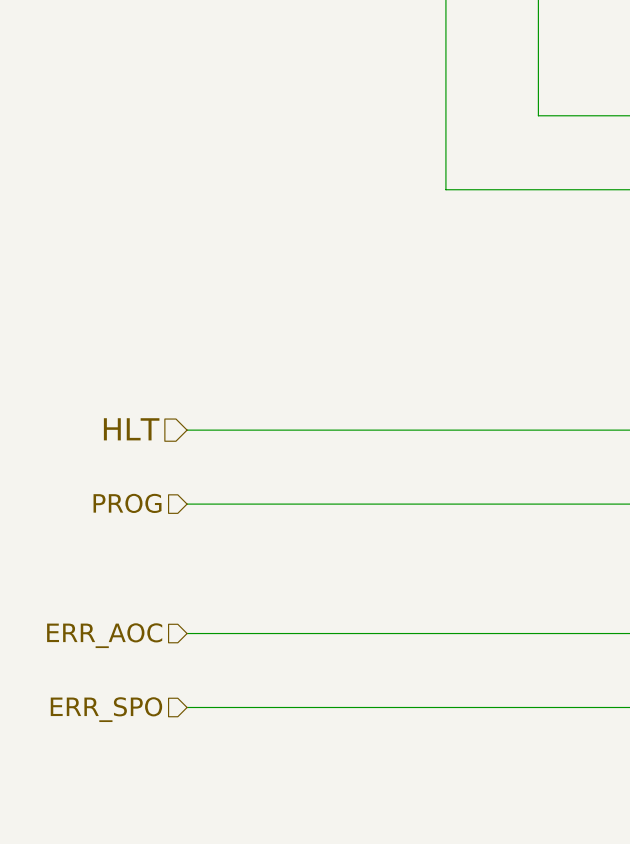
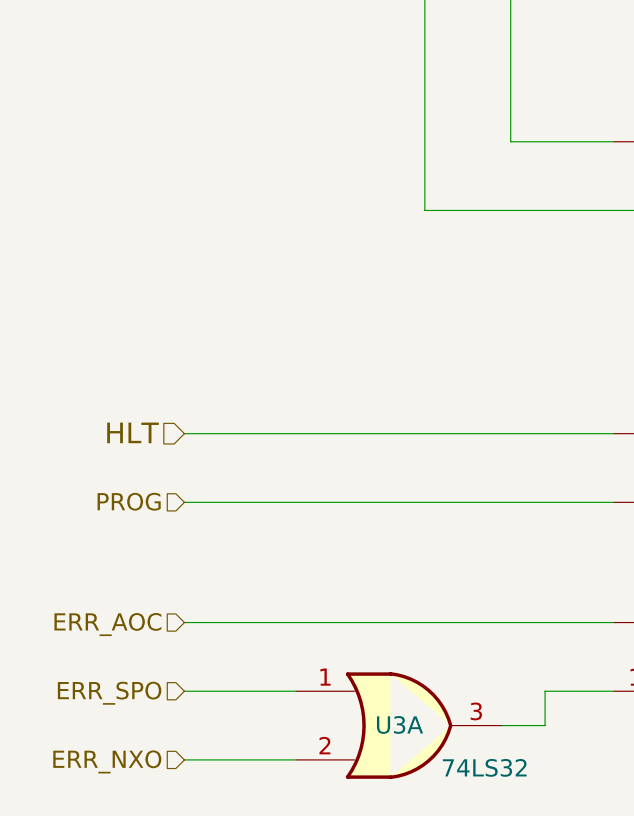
wire: (307, 707) (575, 707) -> (502, 725) (545, 725) (545, 691)
U3A: none -> 74LS32 (399, 725)
wire: none -> (184, 759) (296, 759)
hierarchical label: none -> ERR_NXO (107, 761)

